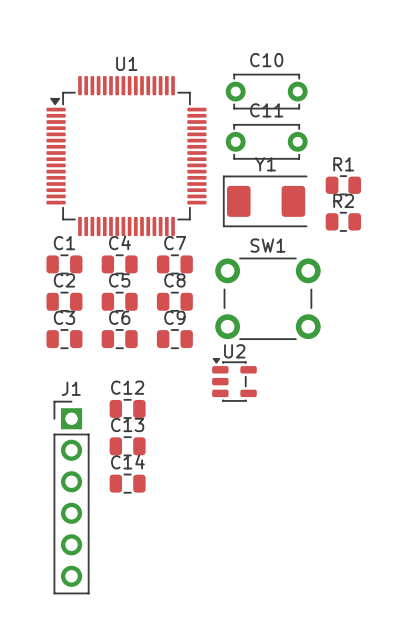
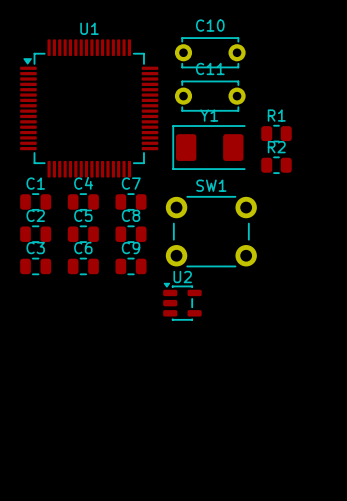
C12: (127, 408) -> none
C13: (127, 446) -> none
C14: (127, 483) -> none
J1: (71, 497) -> none

